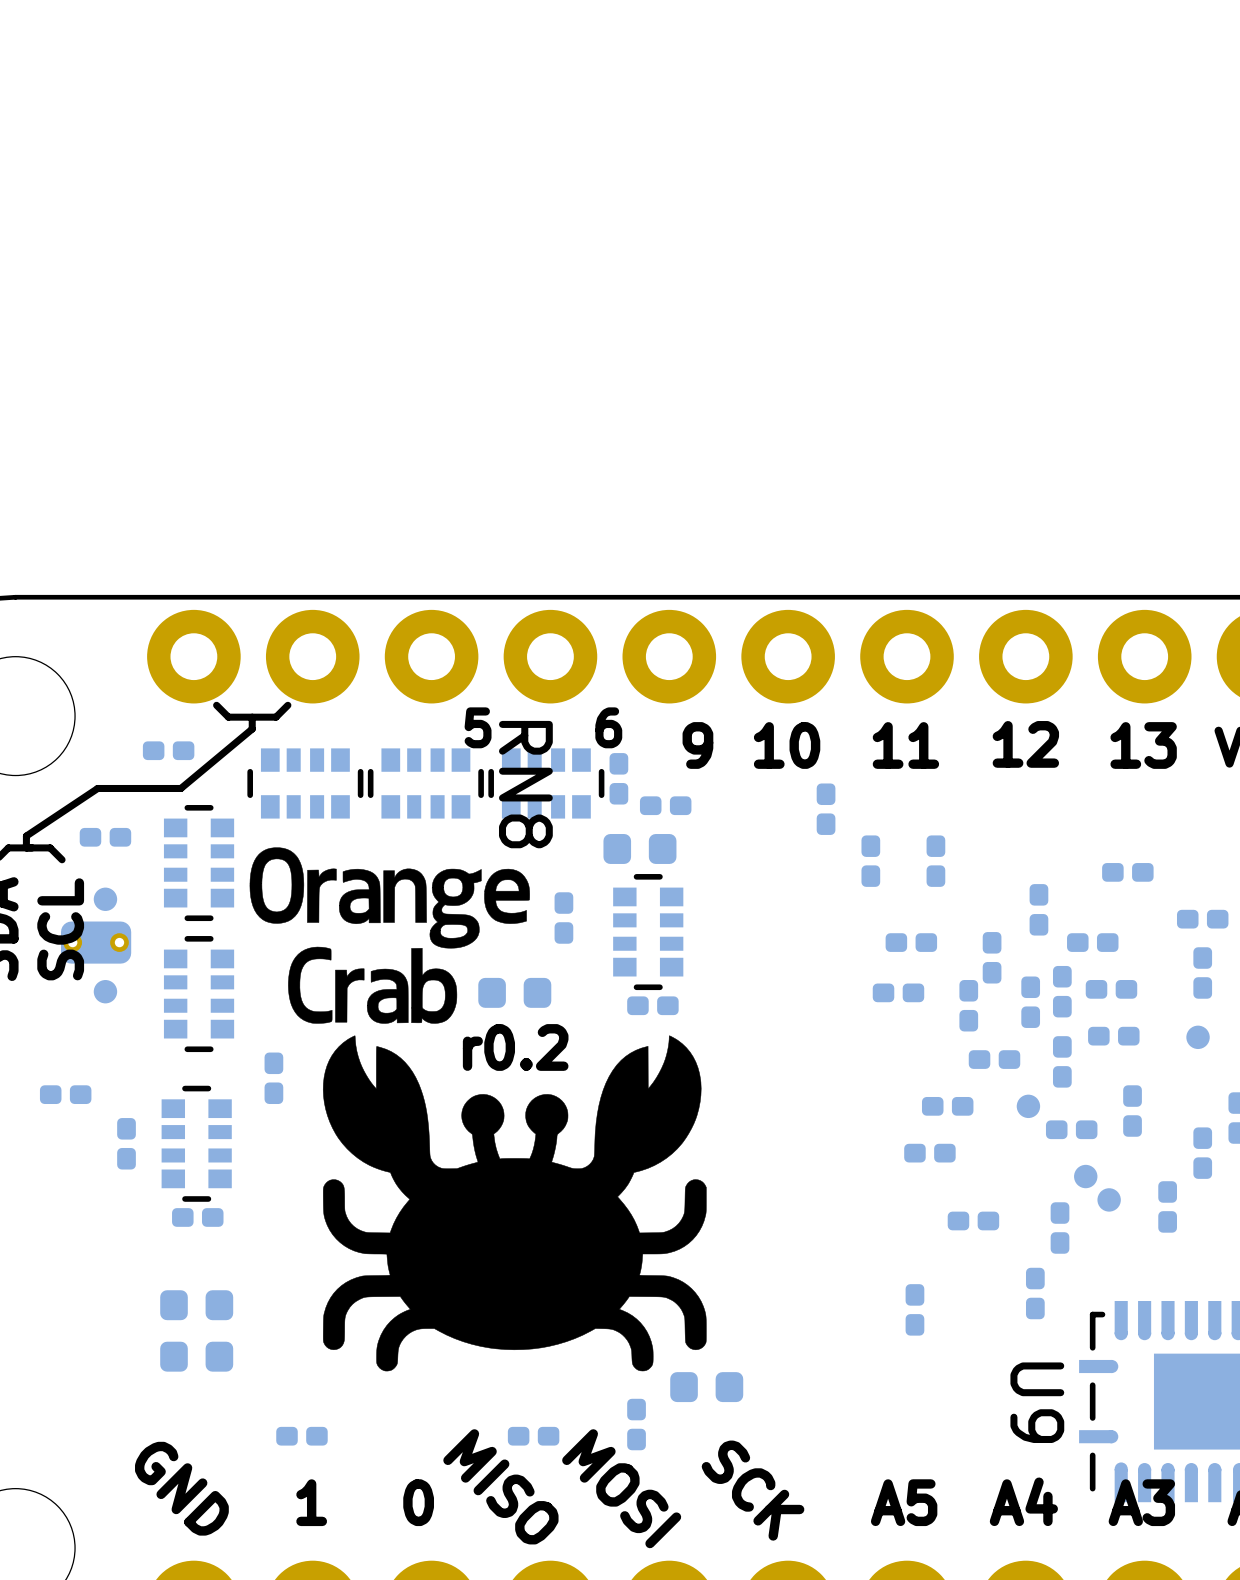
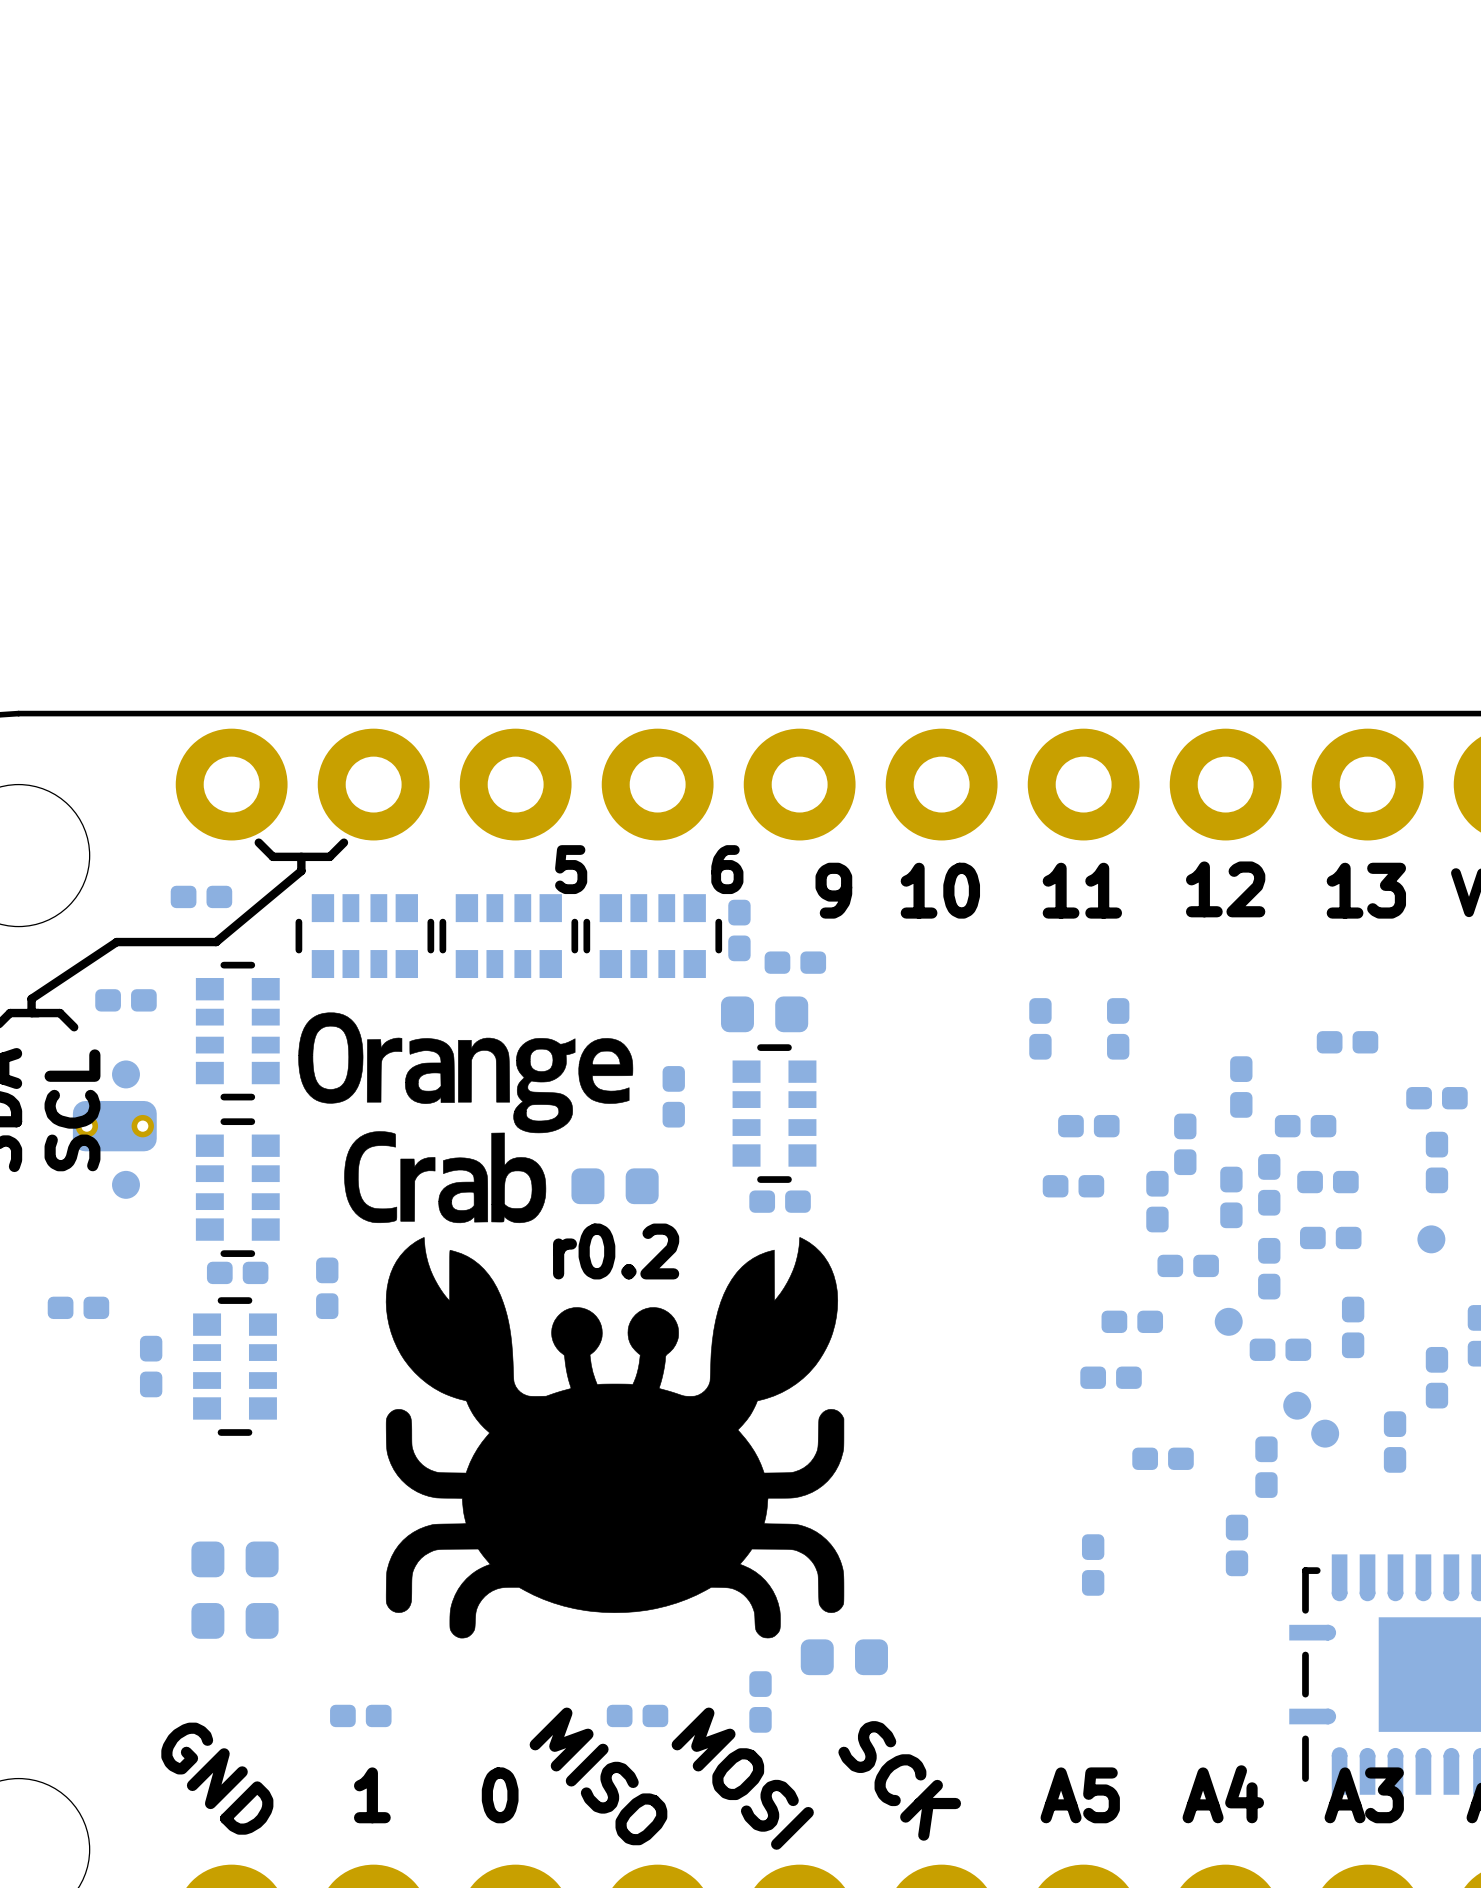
RN8 name: RN8 (525, 784) -> none
part: (826, 809) -> none
part position: (197, 1217) -> (237, 1272)
U9 name: U9 (1037, 1402) -> none

